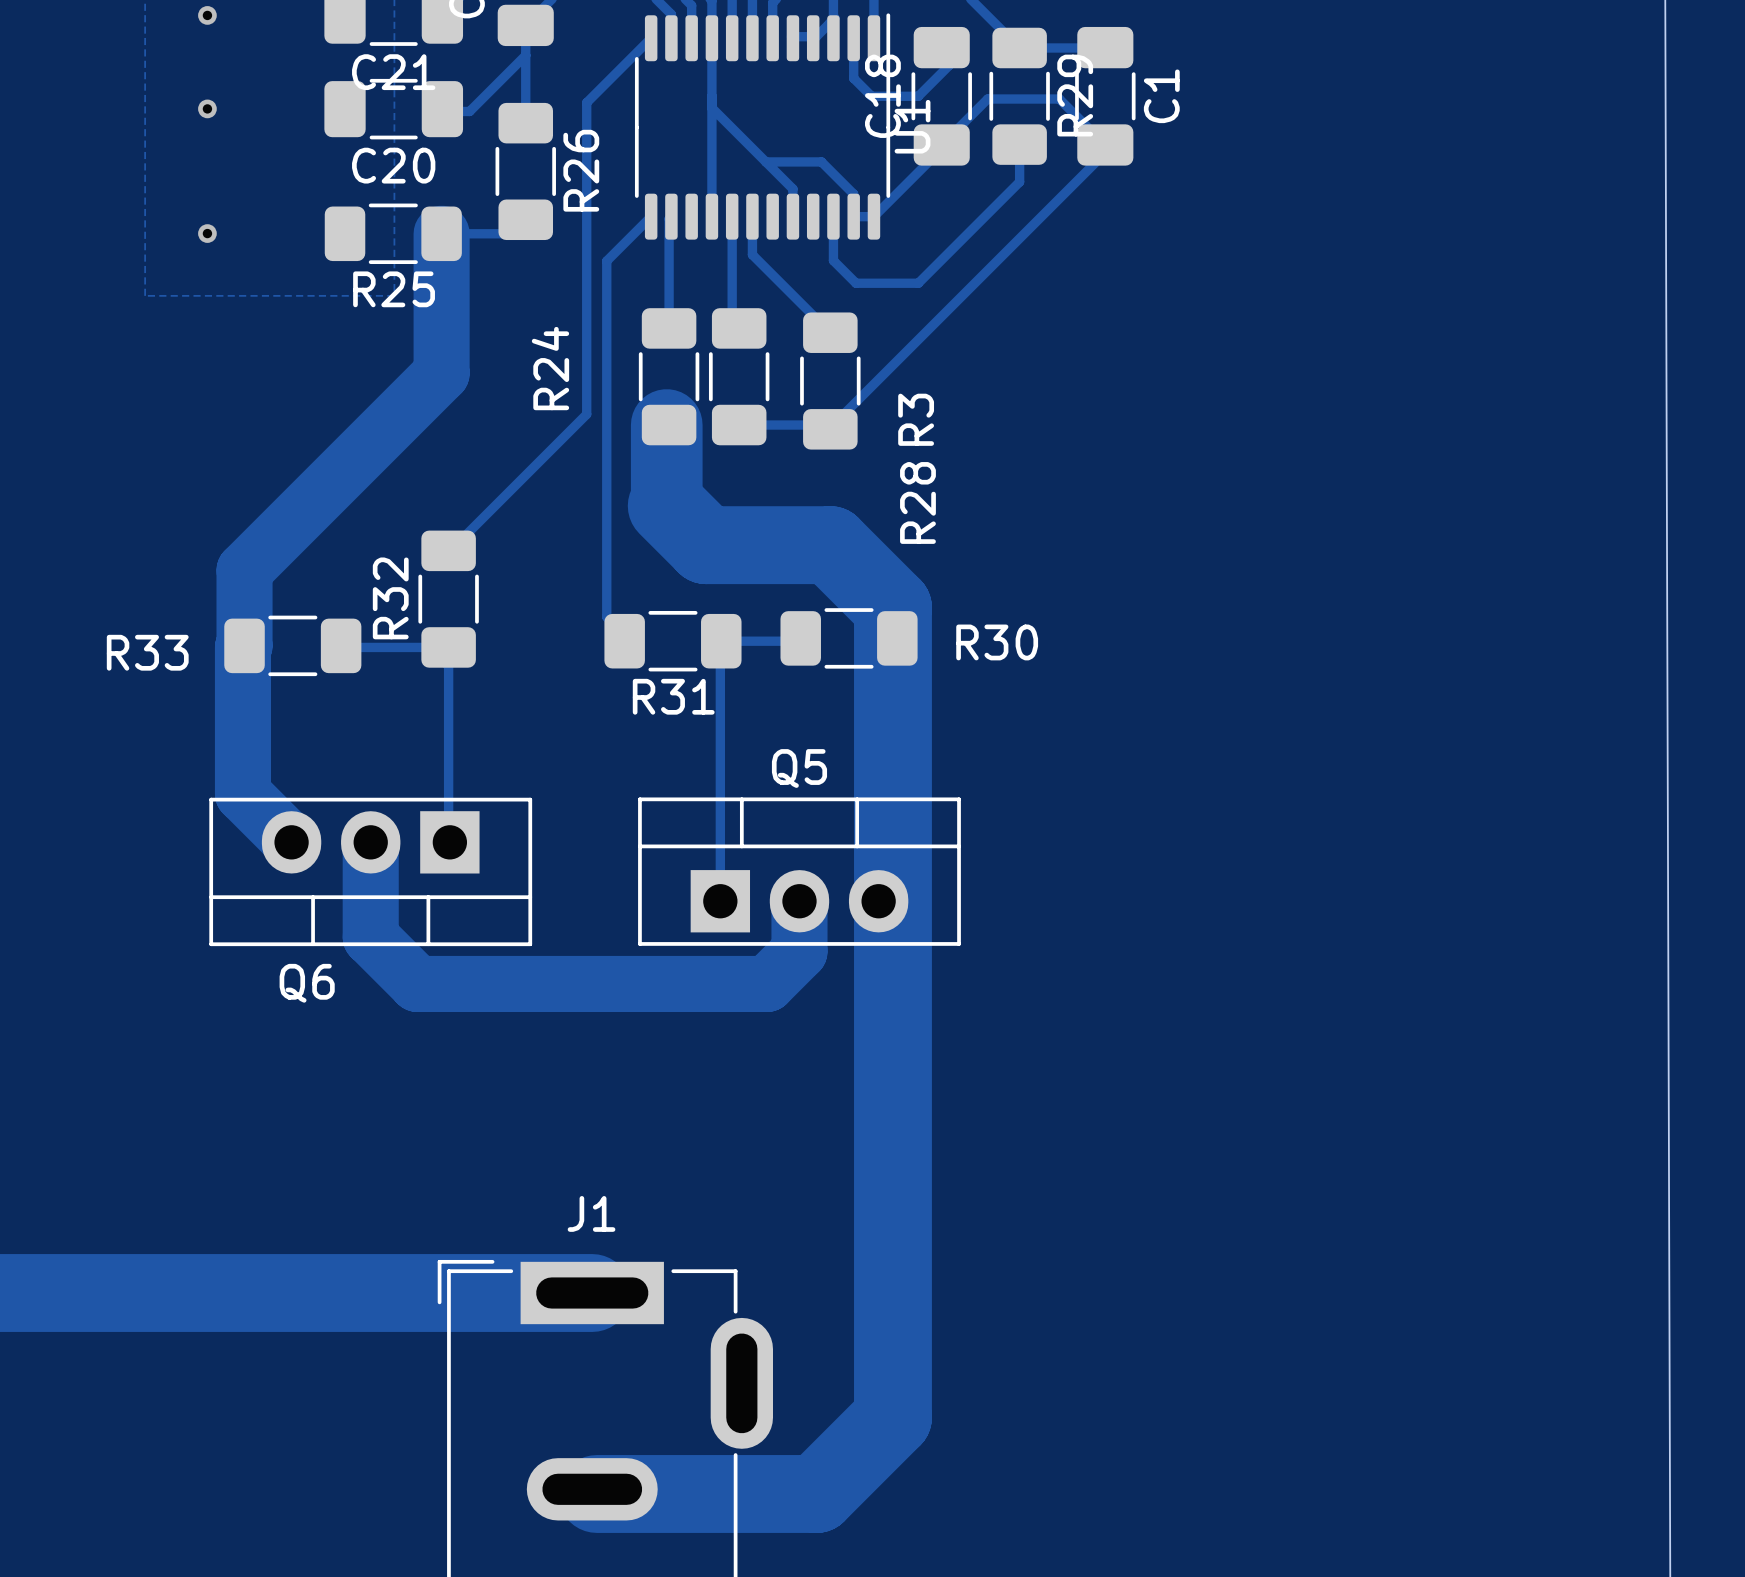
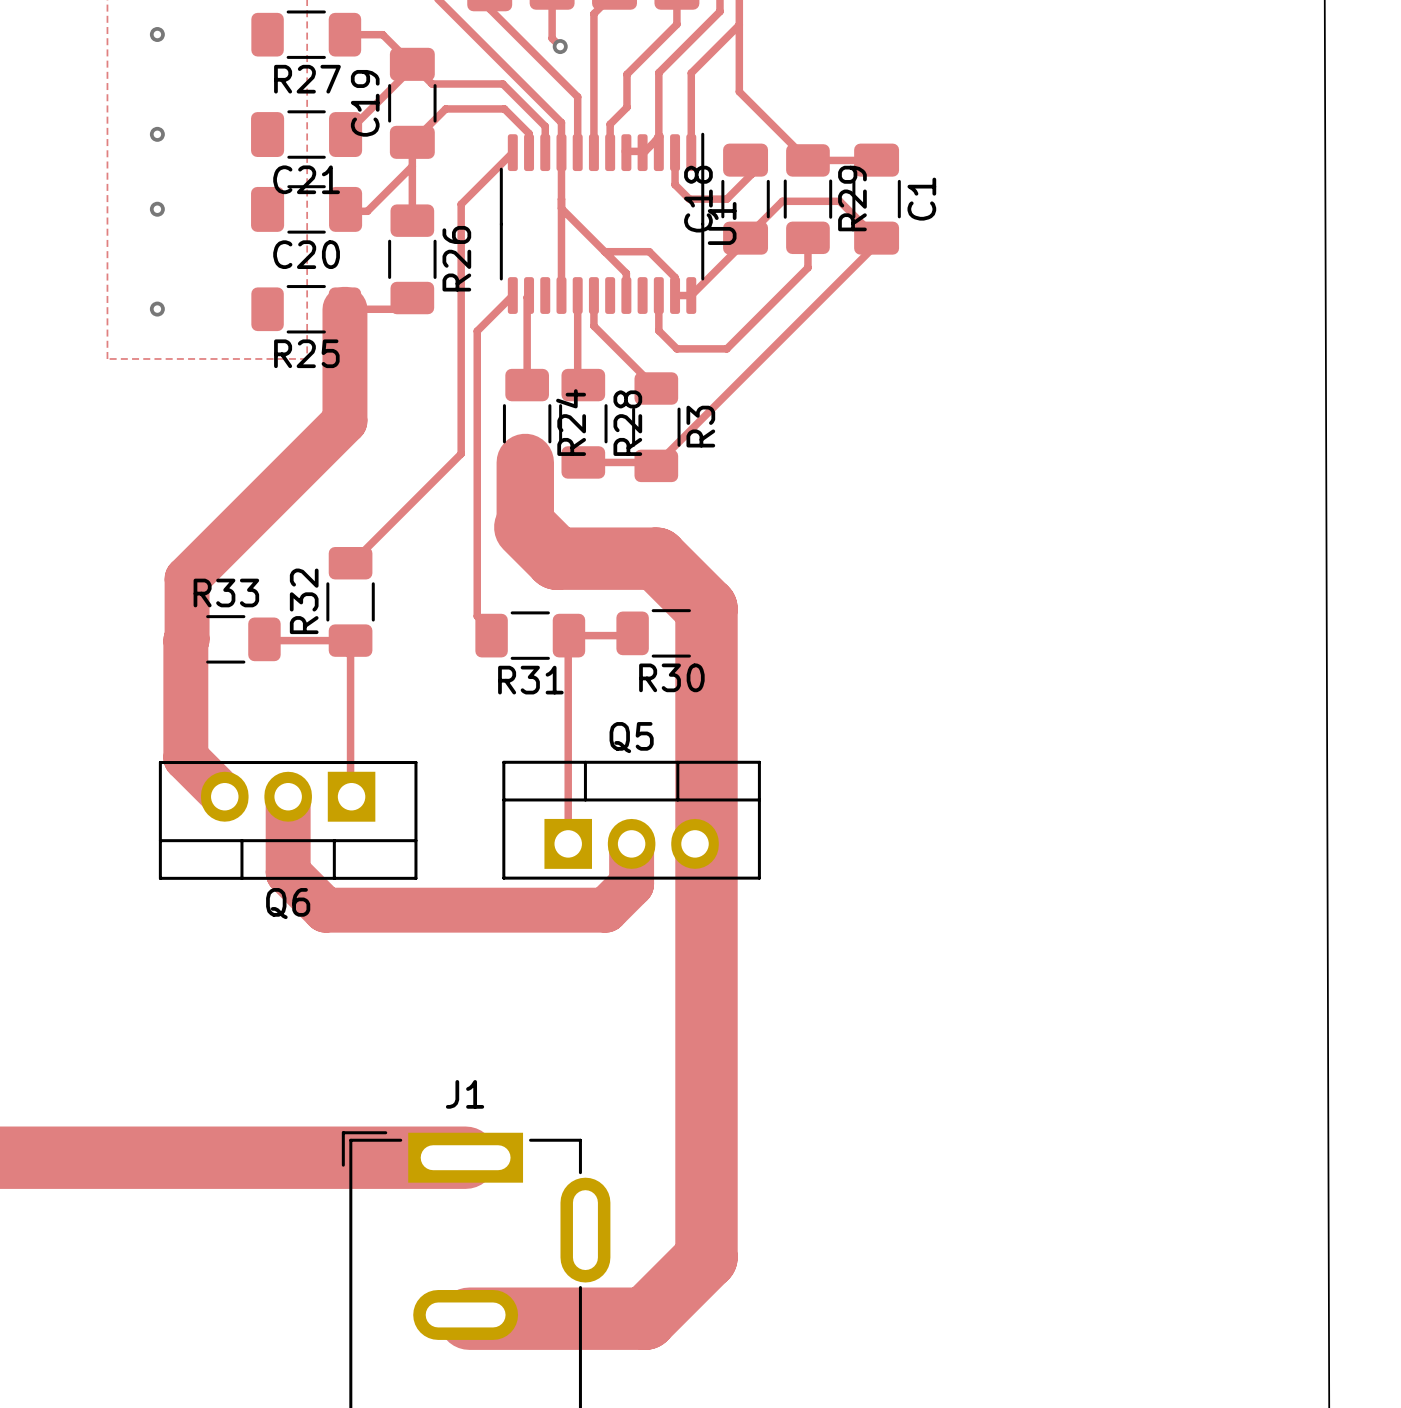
R24 name position: R24 (550, 368) -> R24 (571, 422)
R3 name position: R3 (916, 419) -> R3 (700, 426)
R28 name position: R28 (917, 502) -> R28 (627, 423)
R30 name position: R30 (997, 642) -> R30 (671, 677)
R33 name position: R33 (147, 652) -> R33 (226, 592)
Q6 name position: Q6 (307, 983) -> Q6 (288, 903)

